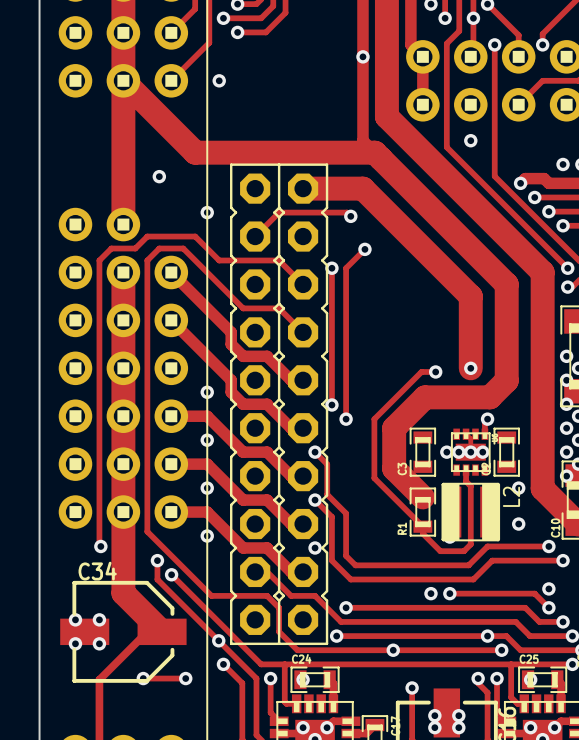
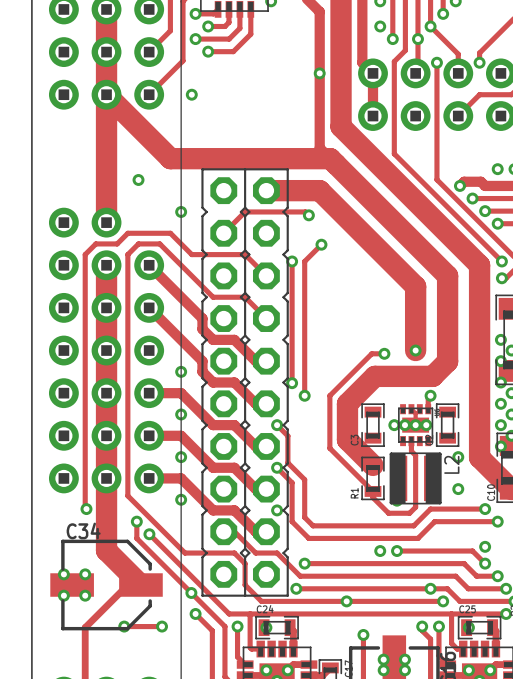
via: (470, 140) -> none

